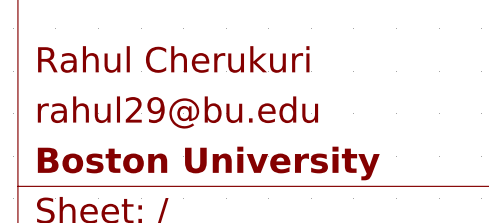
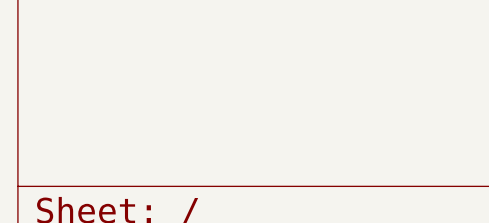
title block: Rahul Cherukuri (173, 59) -> none
title block: rahul29@bu.edu (177, 112) -> none
title block: Boston University (208, 163) -> none

